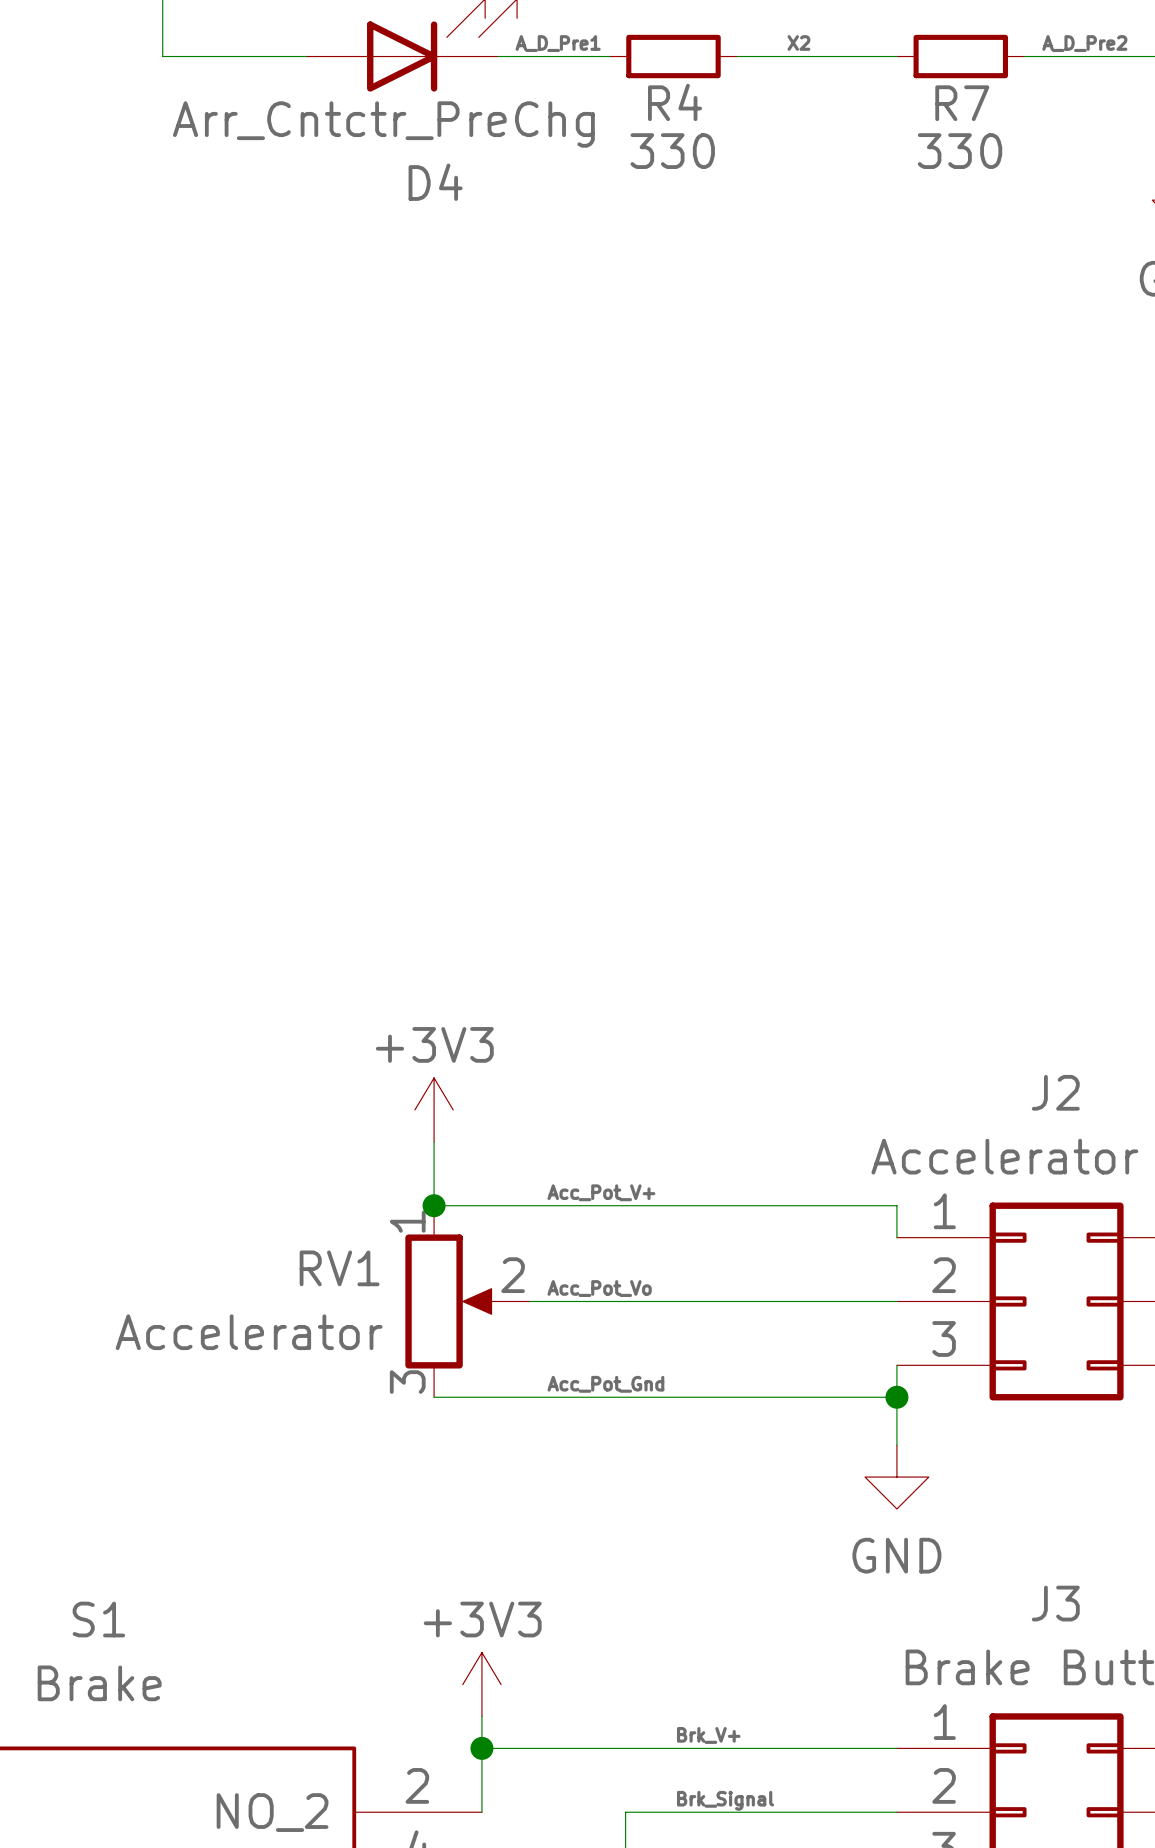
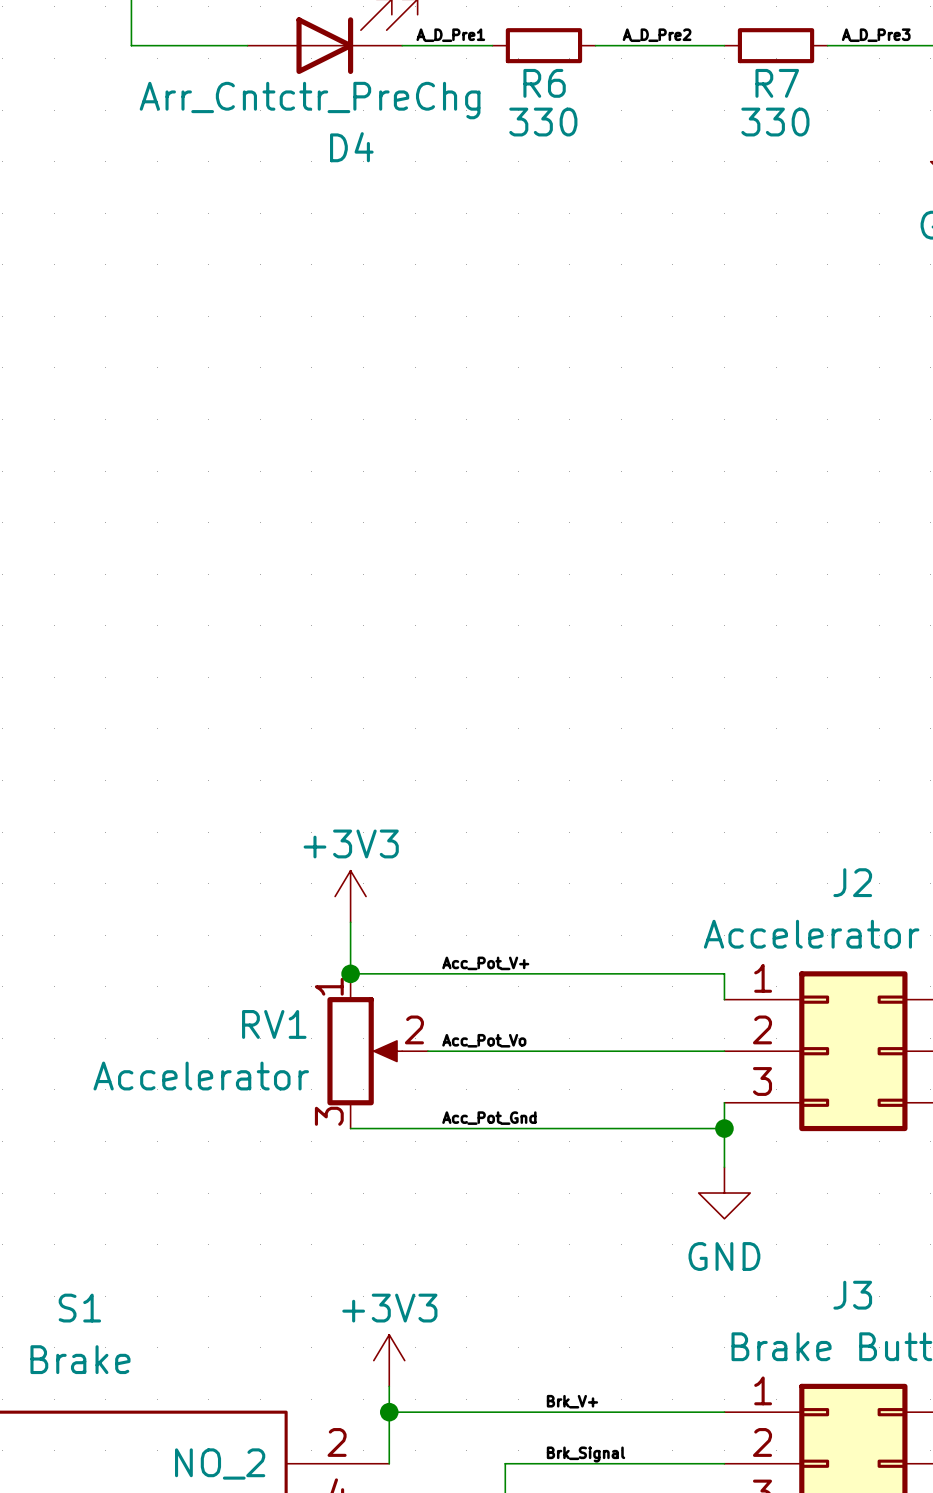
label: X2 (798, 42) -> A_D_Pre2 (657, 35)
label: A_D_Pre2 (1084, 43) -> A_D_Pre3 (876, 35)
R4 name: R4 (675, 102) -> R6 (544, 83)

